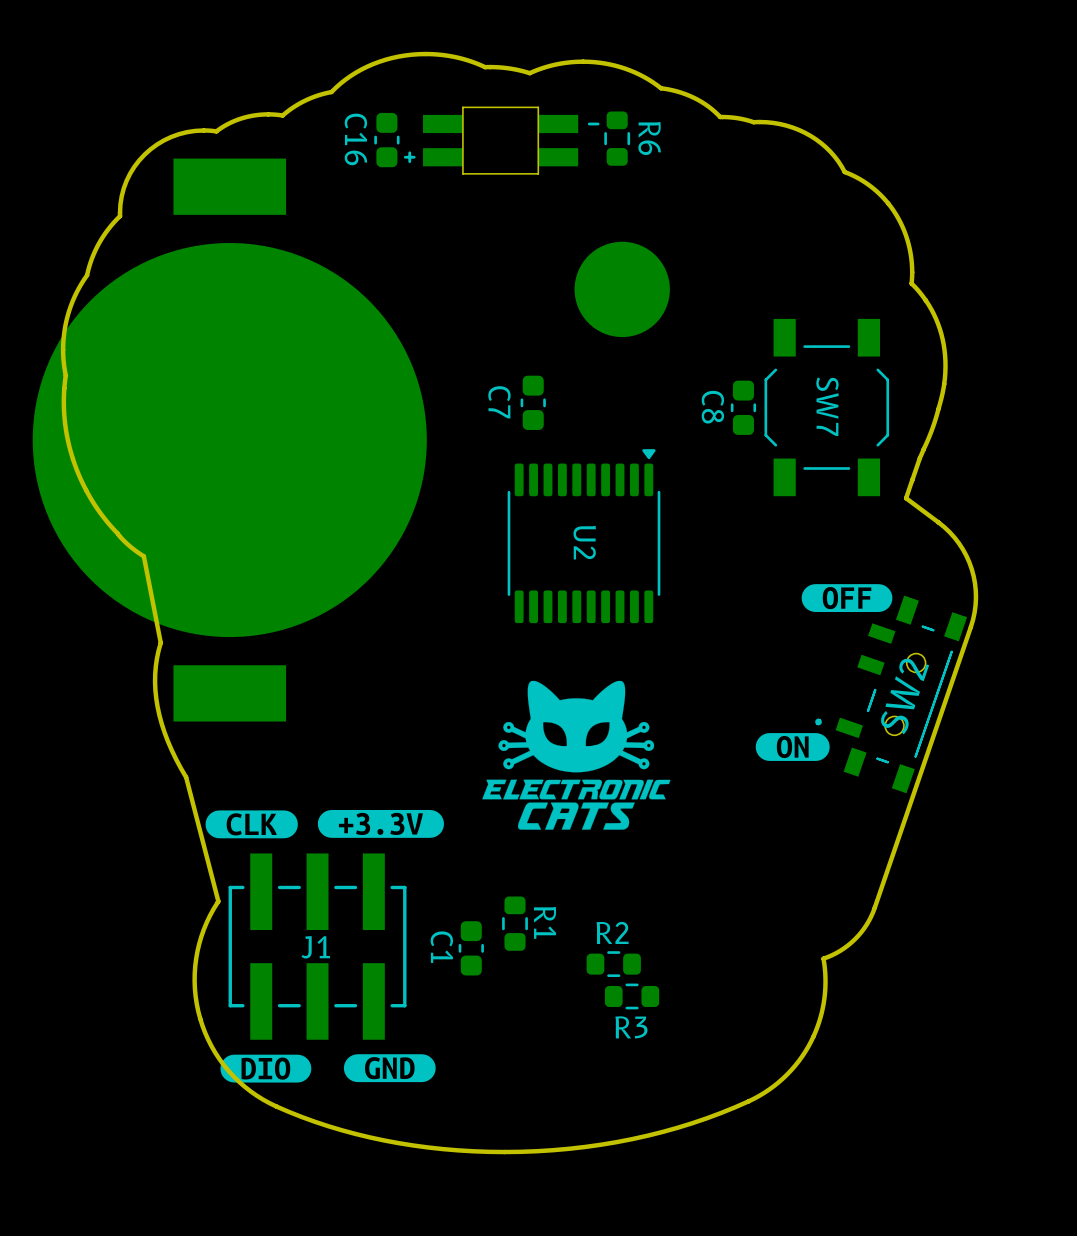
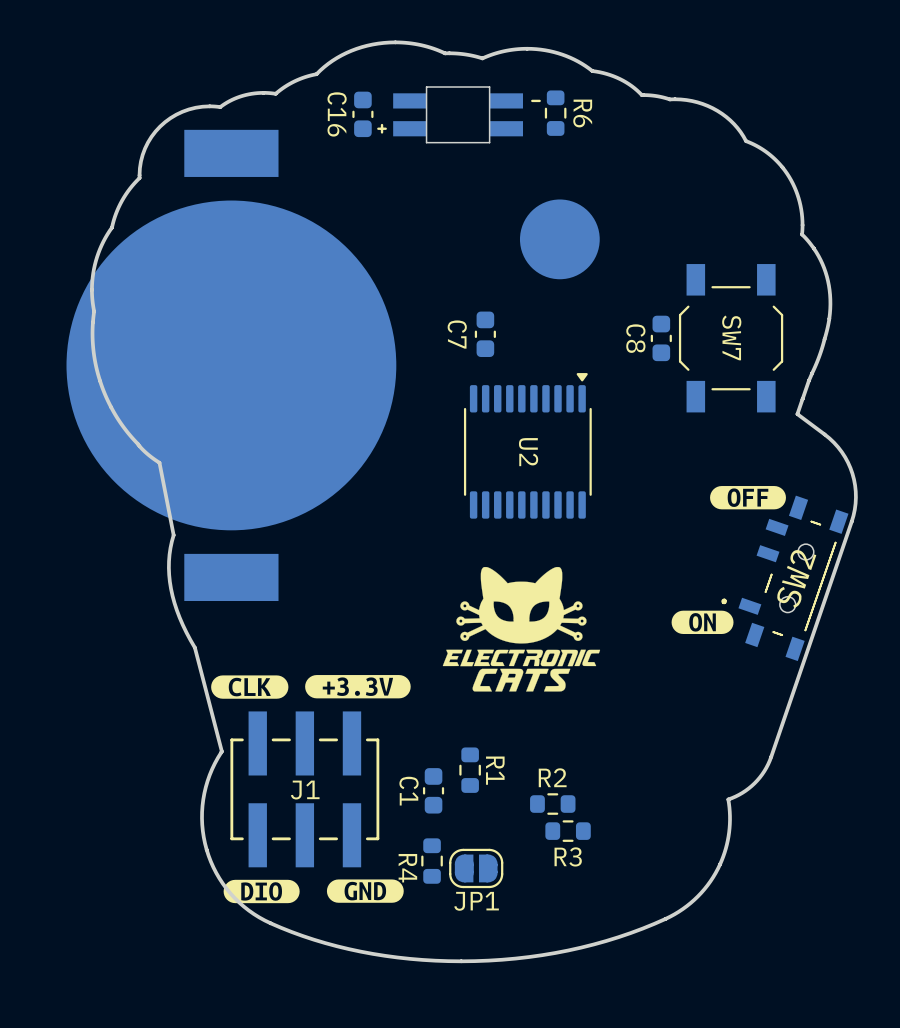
R4: none -> (432, 861)
JP1: none -> (476, 868)

